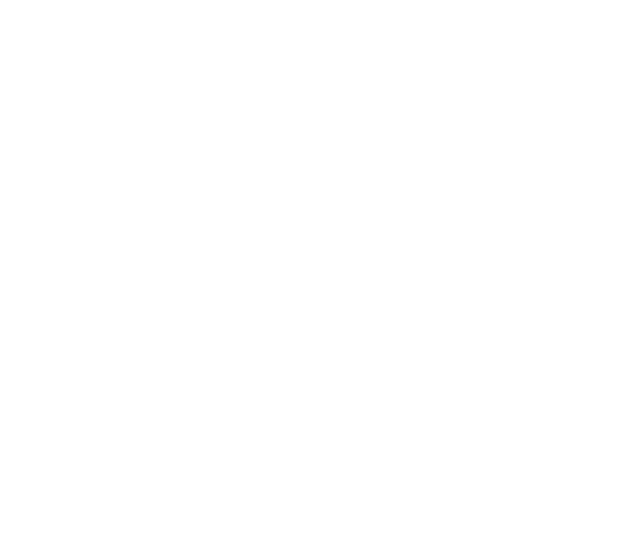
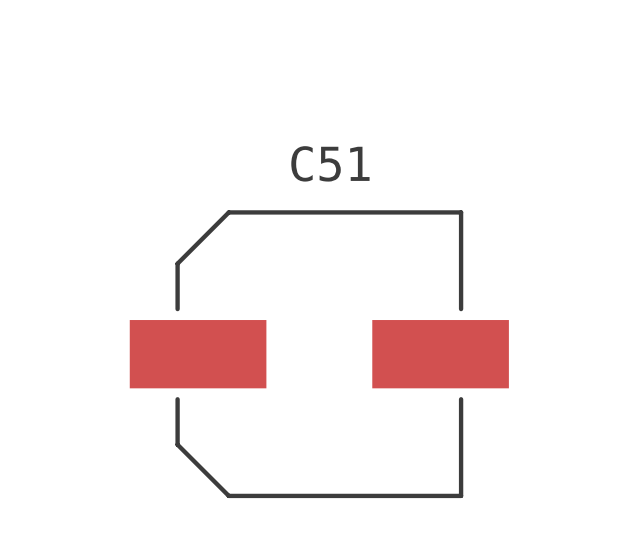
C51: none -> (319, 354)

